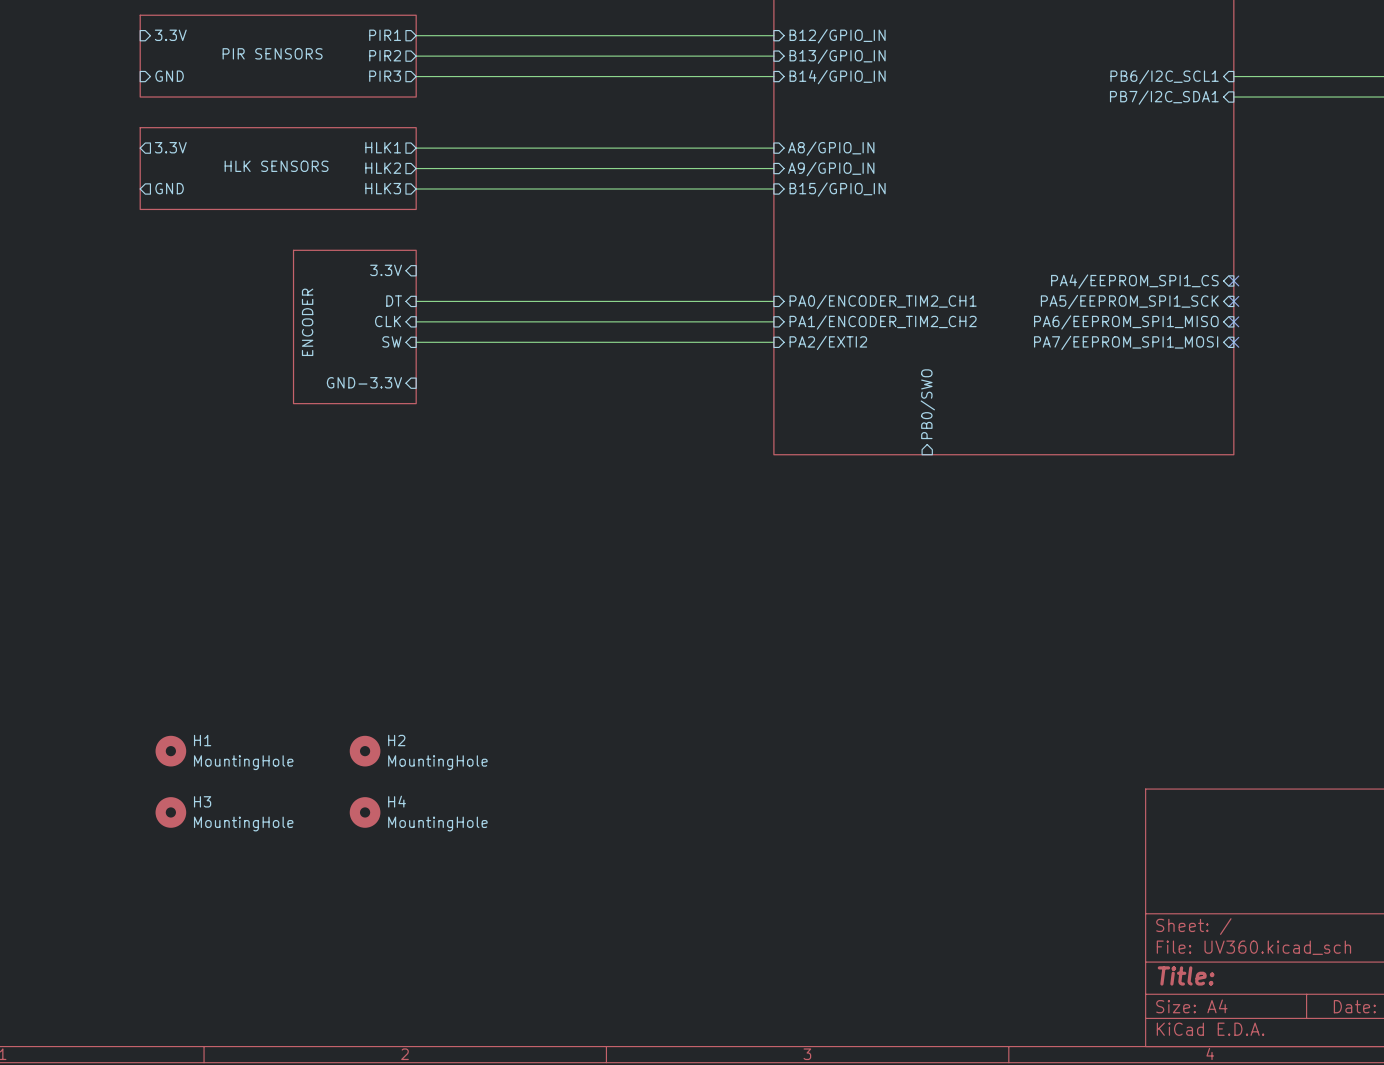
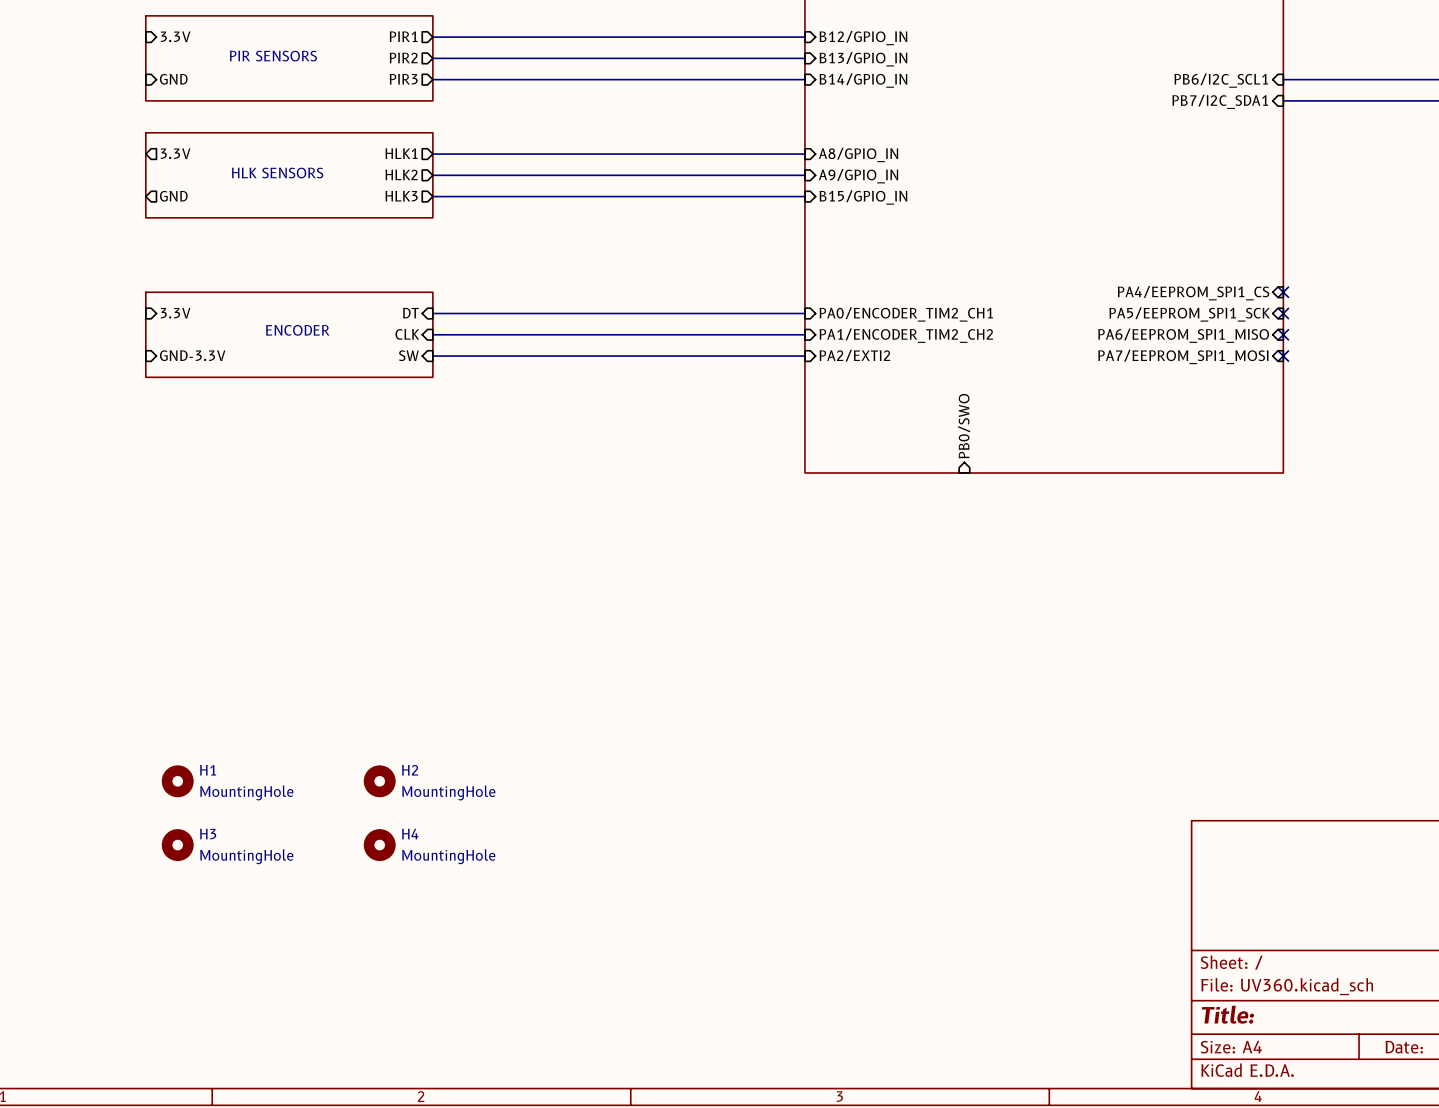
sheet pin: 3.3V (386, 270) -> none
sheet pin: none -> 3.3V (175, 313)
sheet ENCODER: none -> (289, 334)
sheet ENCODER: (354, 326) -> none
sheet pin: none -> GND-3.3V (192, 355)
sheet pin: GND-3.3V (364, 382) -> none

